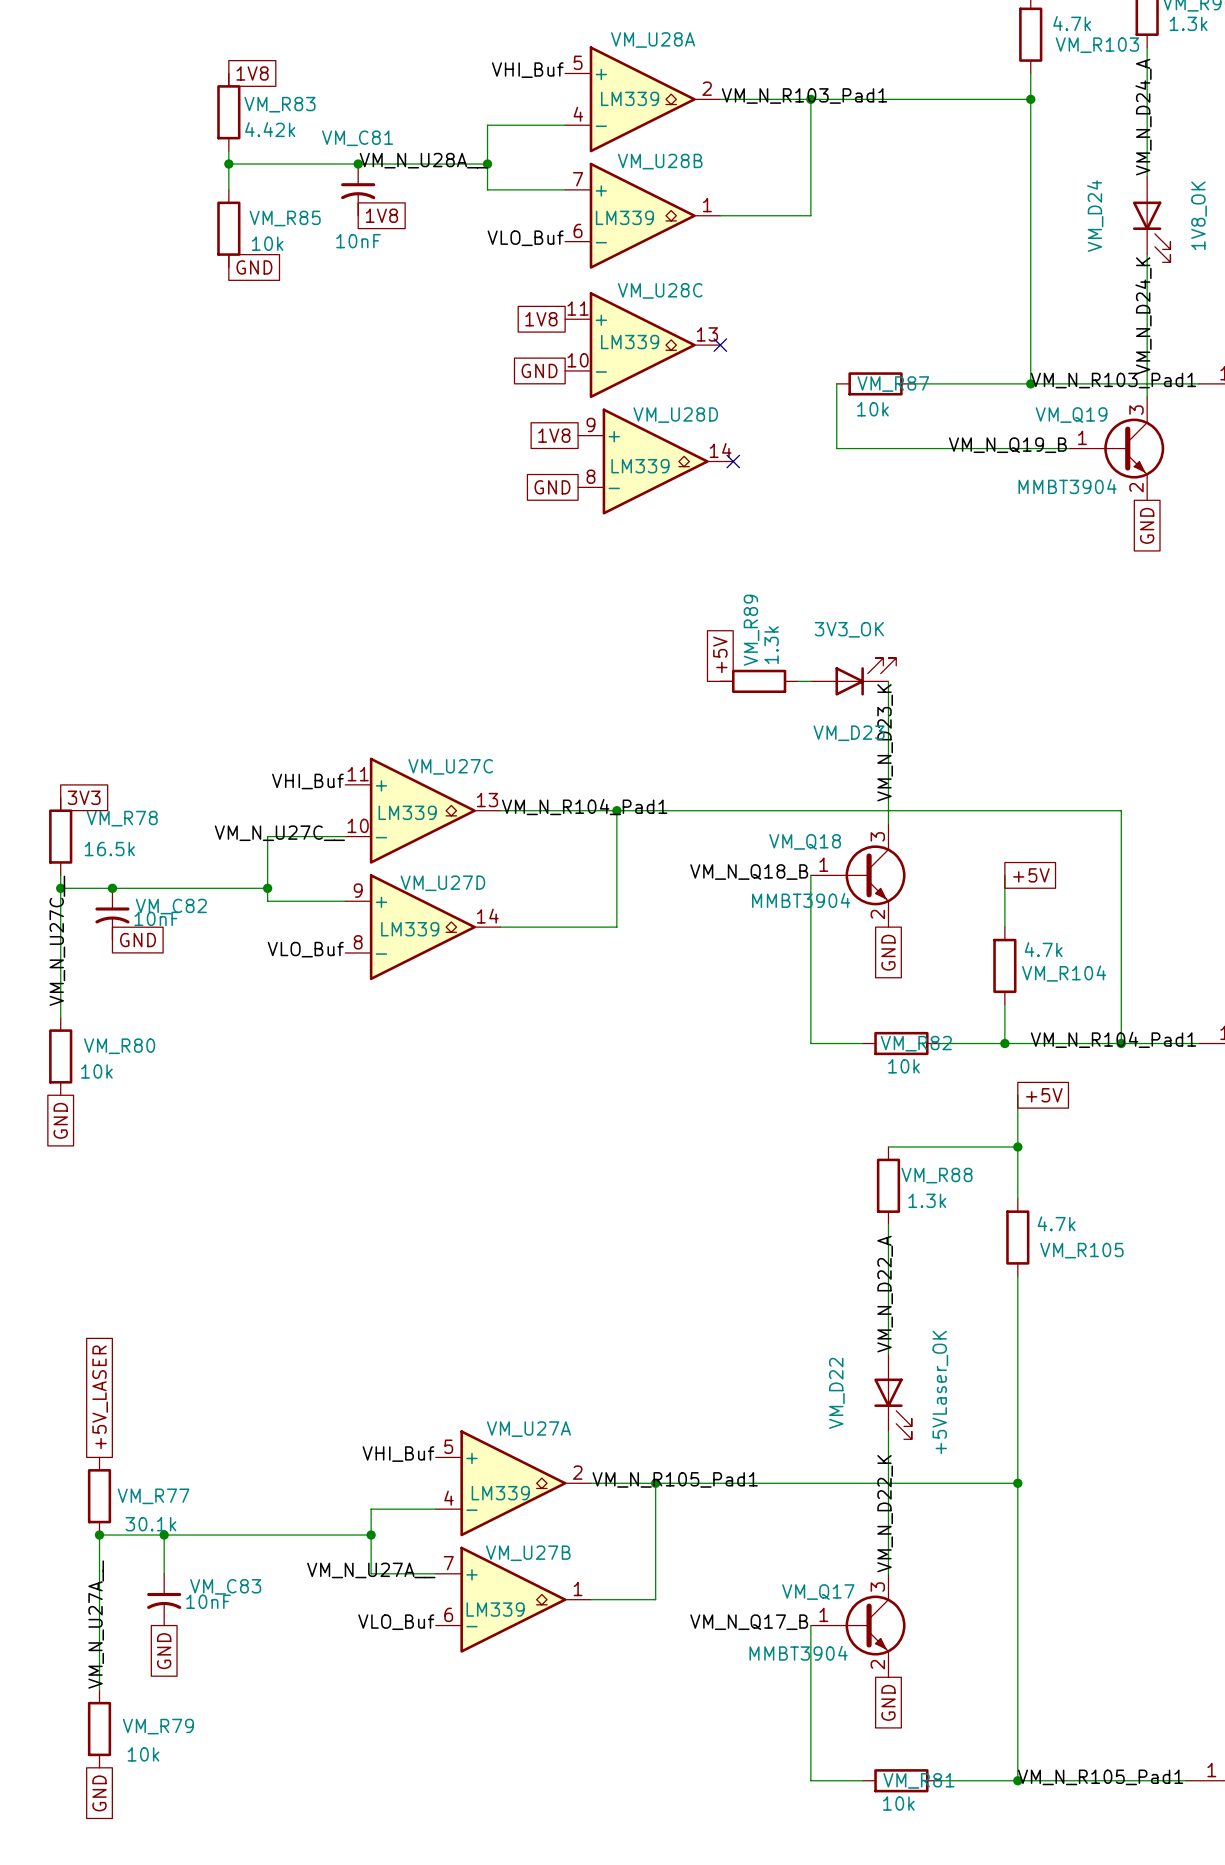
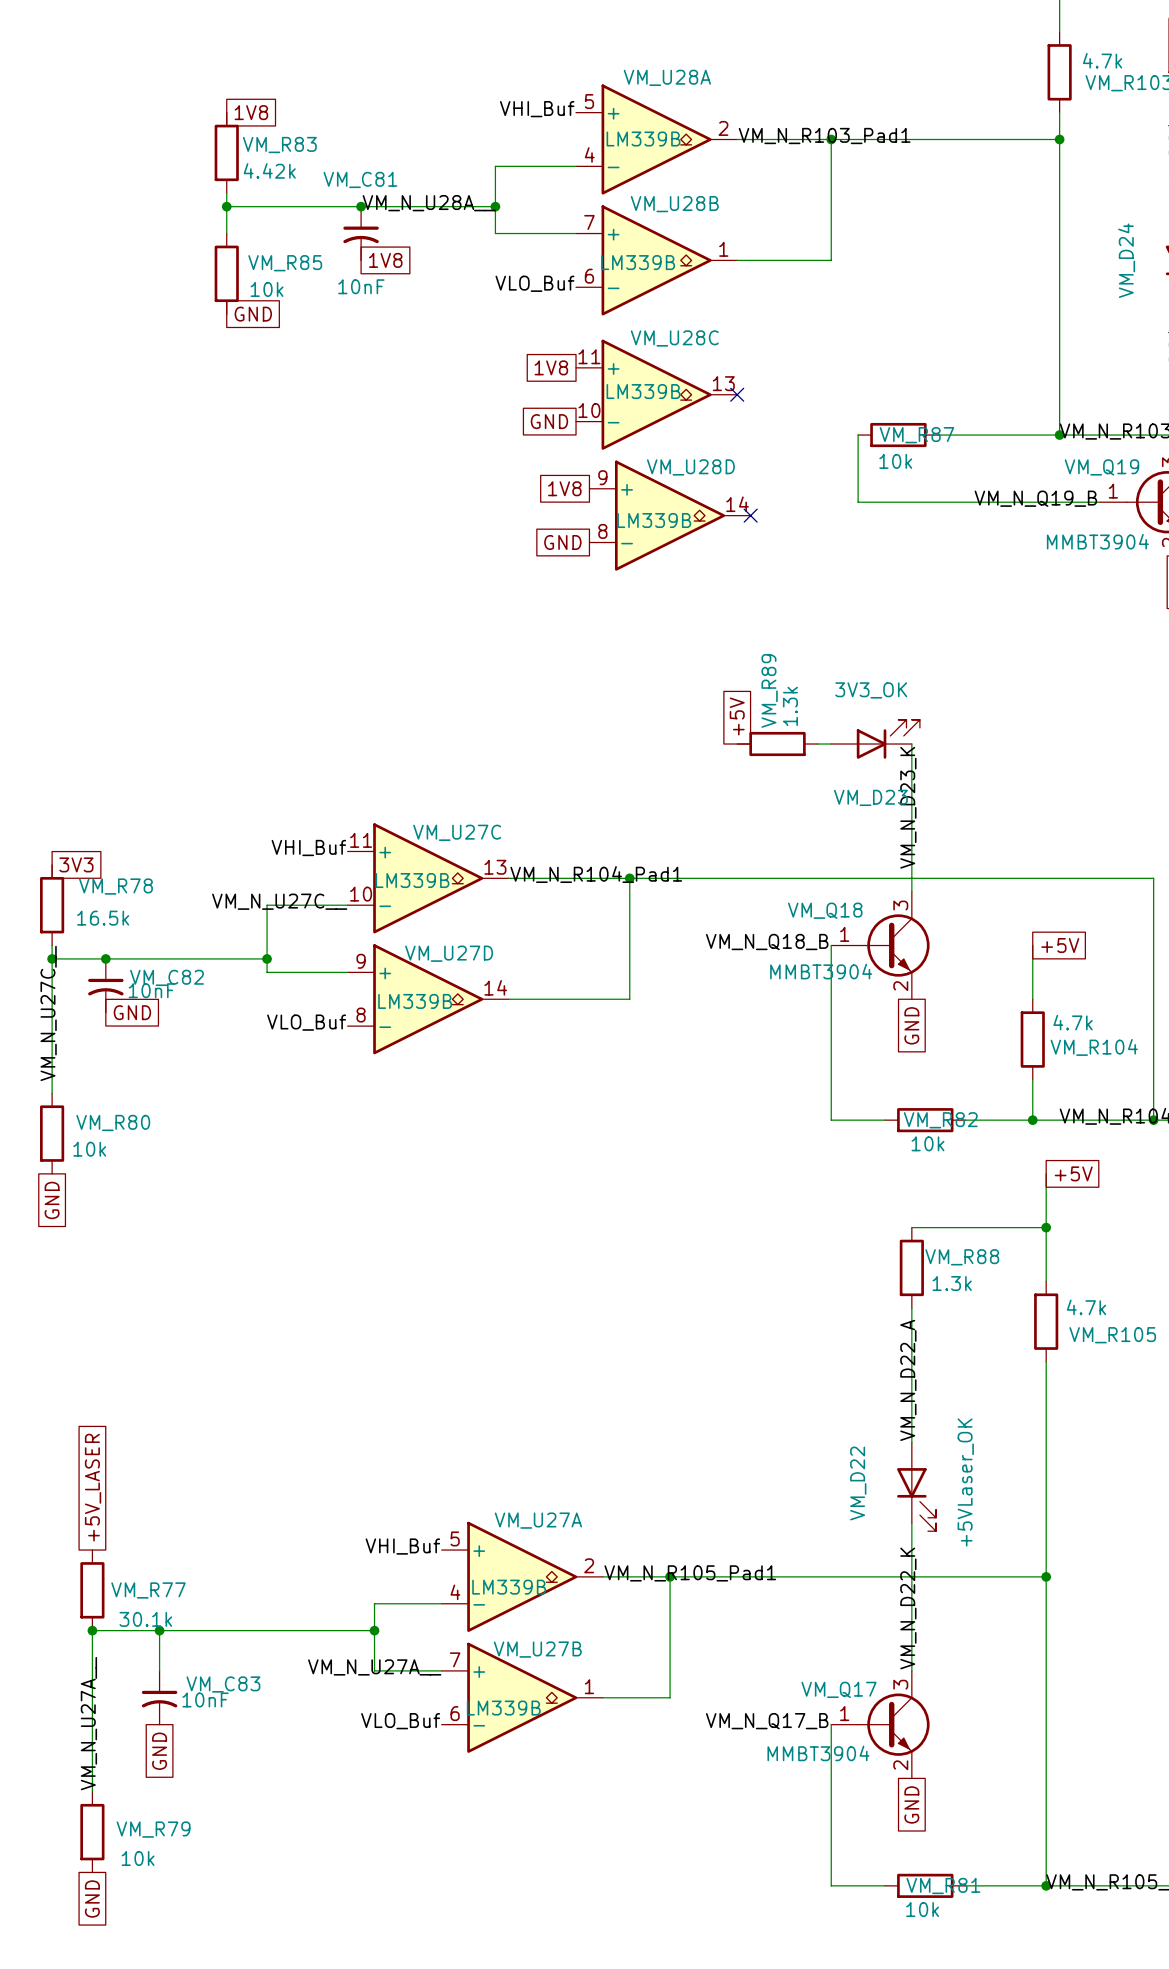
VM_U28A value: LM339 (630, 98) -> LM339B (643, 138)
VM_U28B value: LM339 (624, 217) -> LM339B (638, 262)
VM_U28C value: LM339 (630, 342) -> LM339B (643, 391)
VM_U28D value: LM339 (640, 466) -> LM339B (654, 520)
VM_U27C value: LM339 (407, 812) -> LM339B (412, 880)
VM_U27D value: LM339 (410, 929) -> LM339B (415, 1001)
VM_U27A value: LM339 (500, 1493) -> LM339B (509, 1587)
VM_U27B value: LM339 (495, 1609) -> LM339B (503, 1708)

